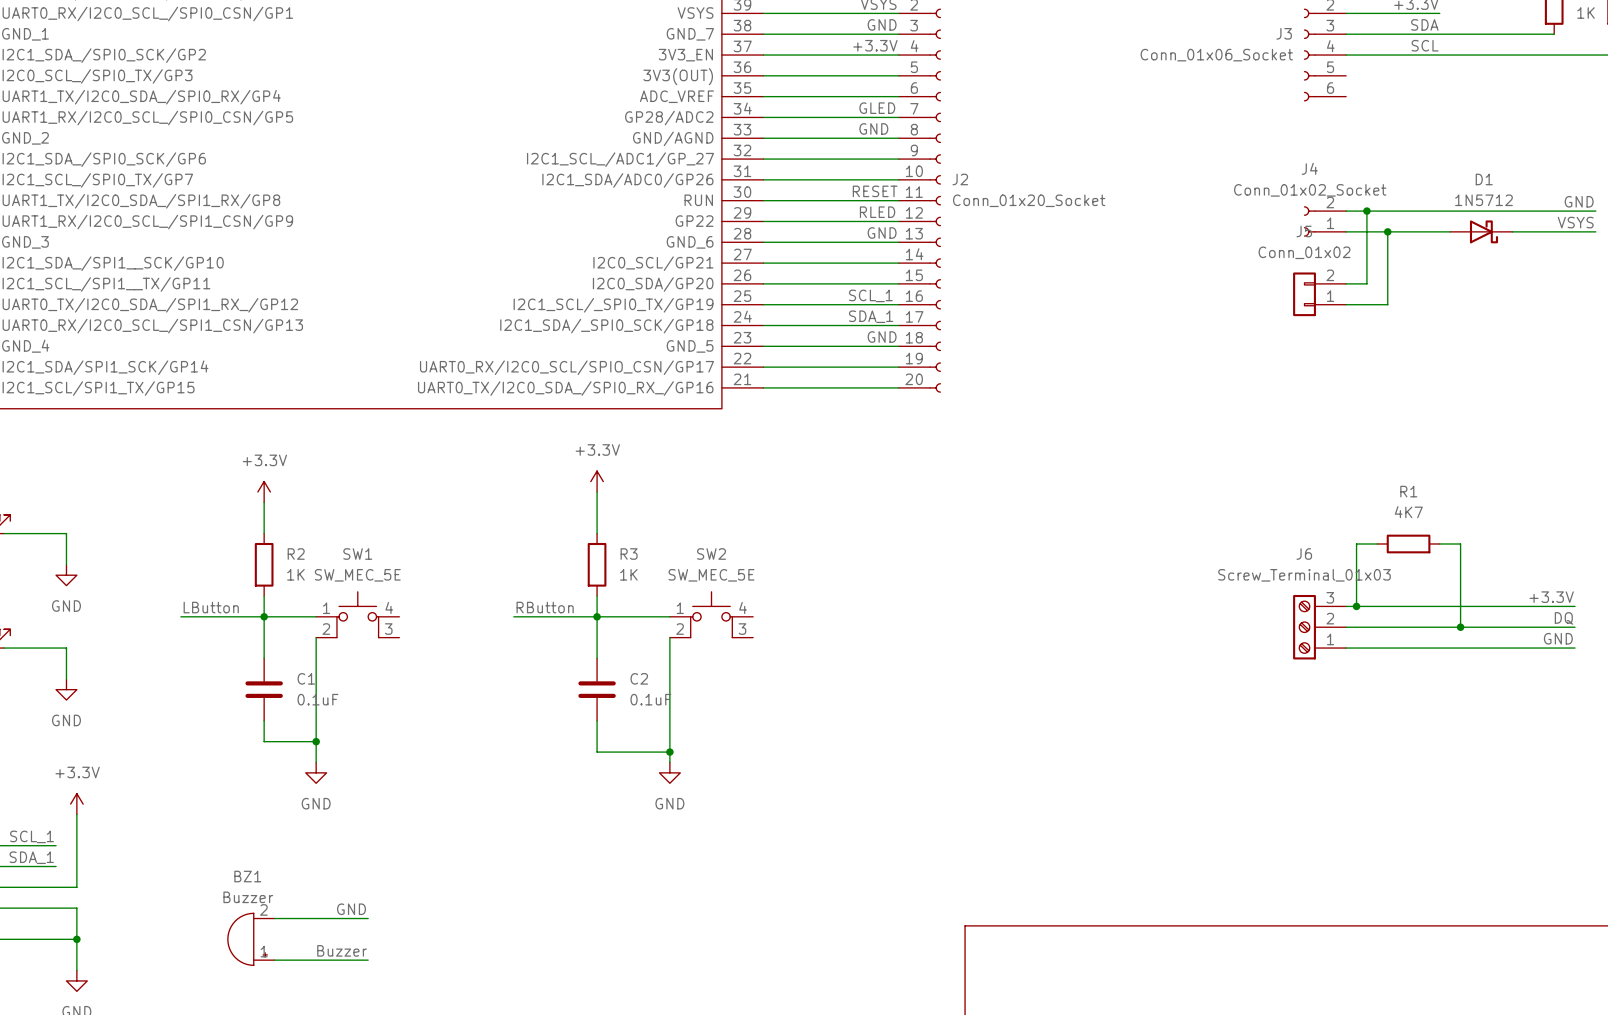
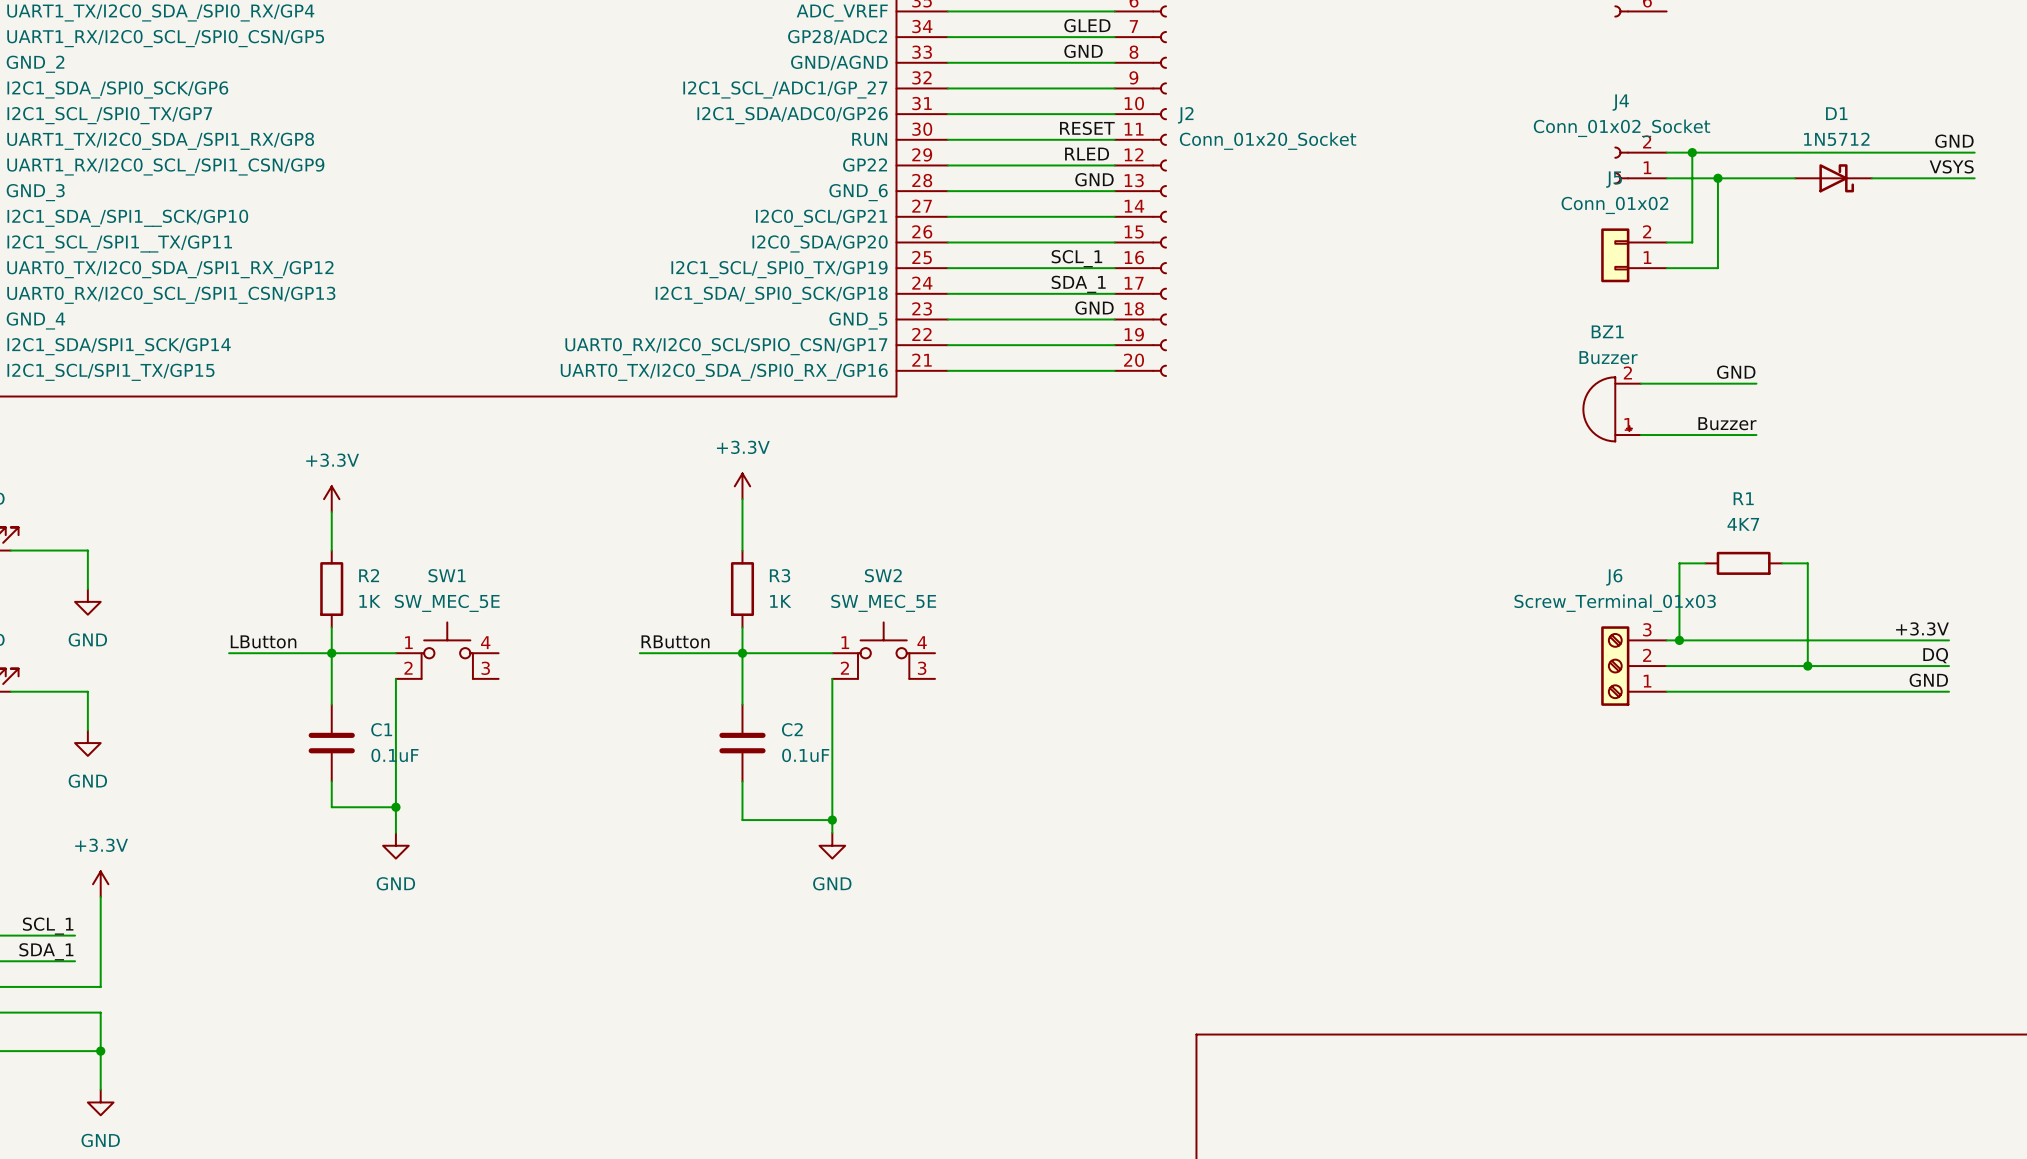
label: none -> GND (1736, 372)
wire: none -> (1640, 383) (1756, 383)
label: none -> Buzzer (1727, 423)
wire: none -> (1640, 435) (1756, 435)
label: GND (351, 909) -> none
wire: (274, 918) (368, 918) -> none
BZ1 position: (251, 939) -> (1612, 409)
label: Buzzer (342, 950) -> none
wire: (274, 960) (368, 960) -> none

